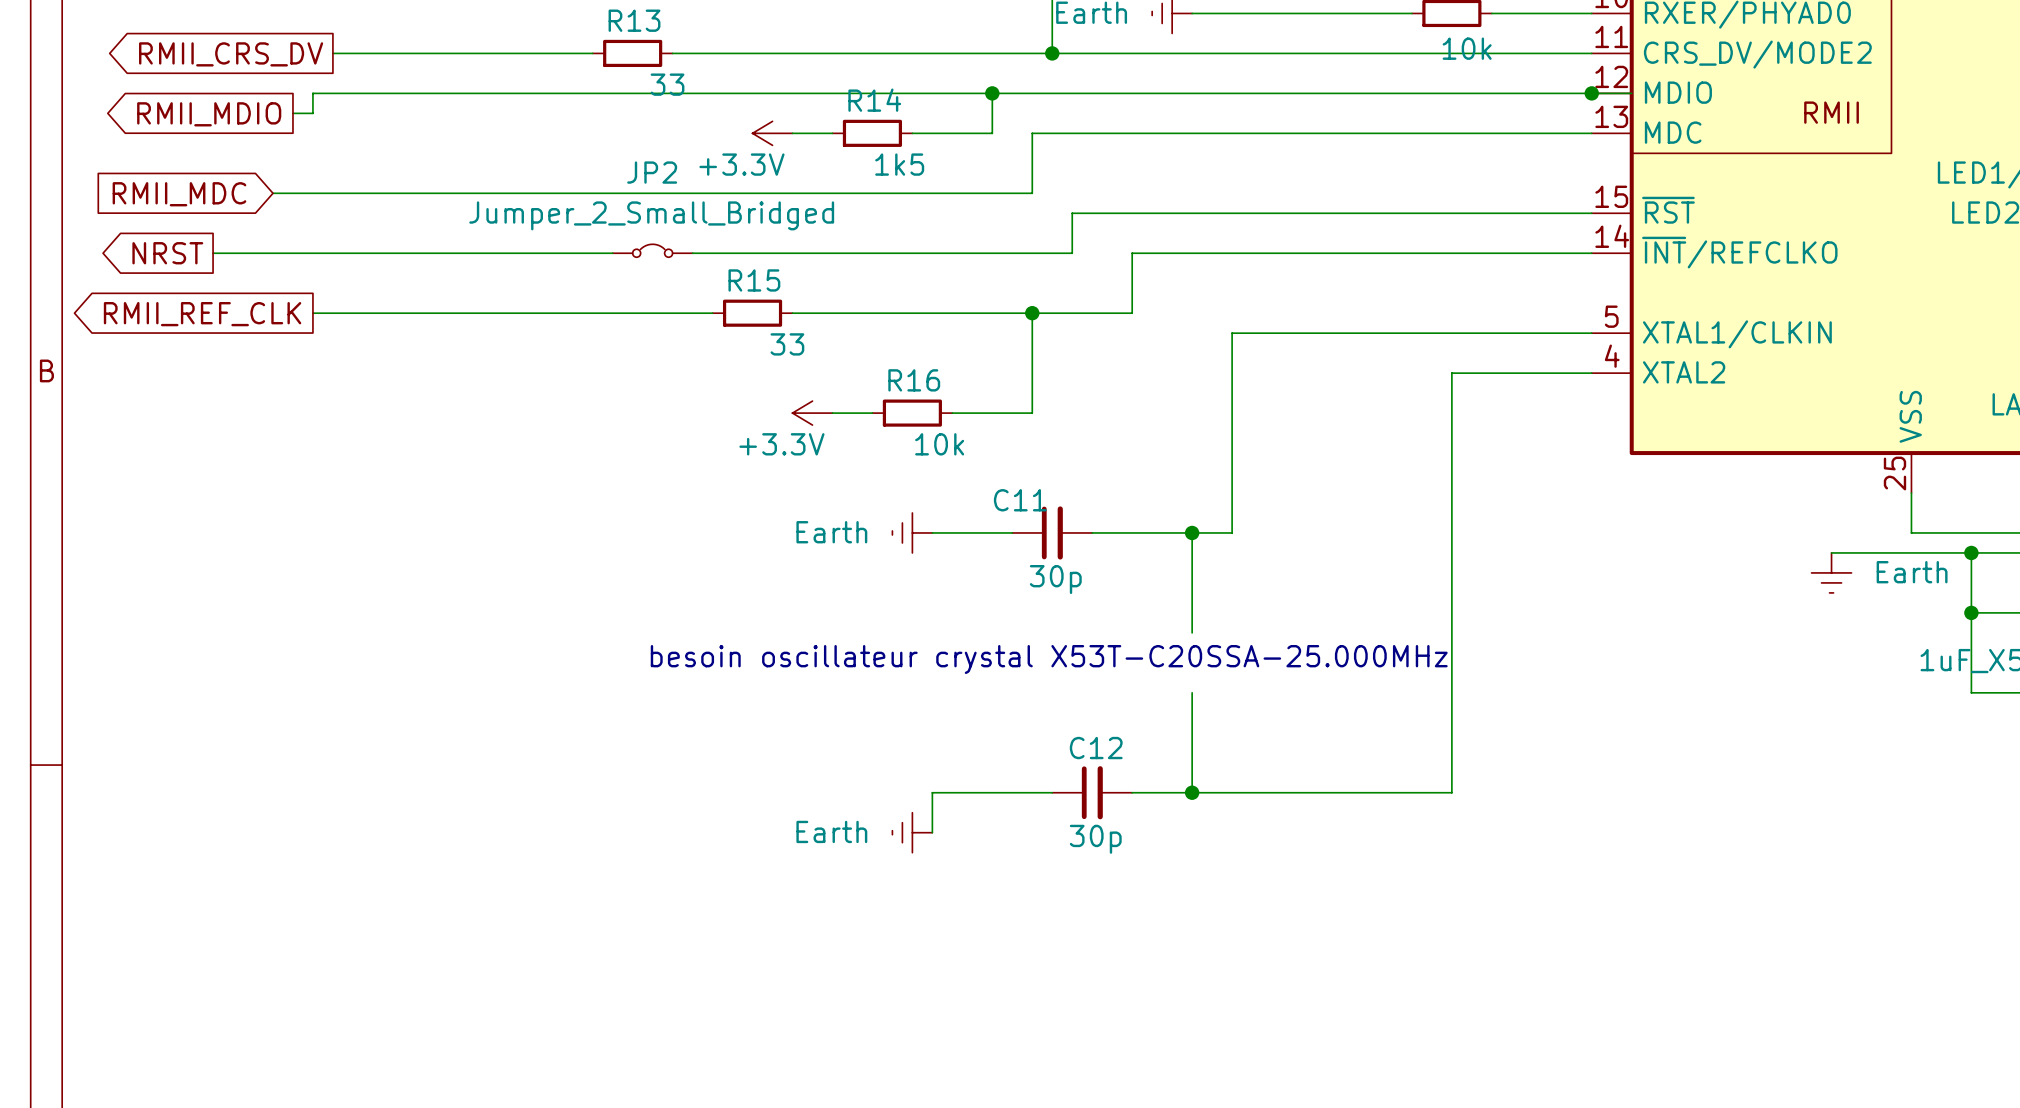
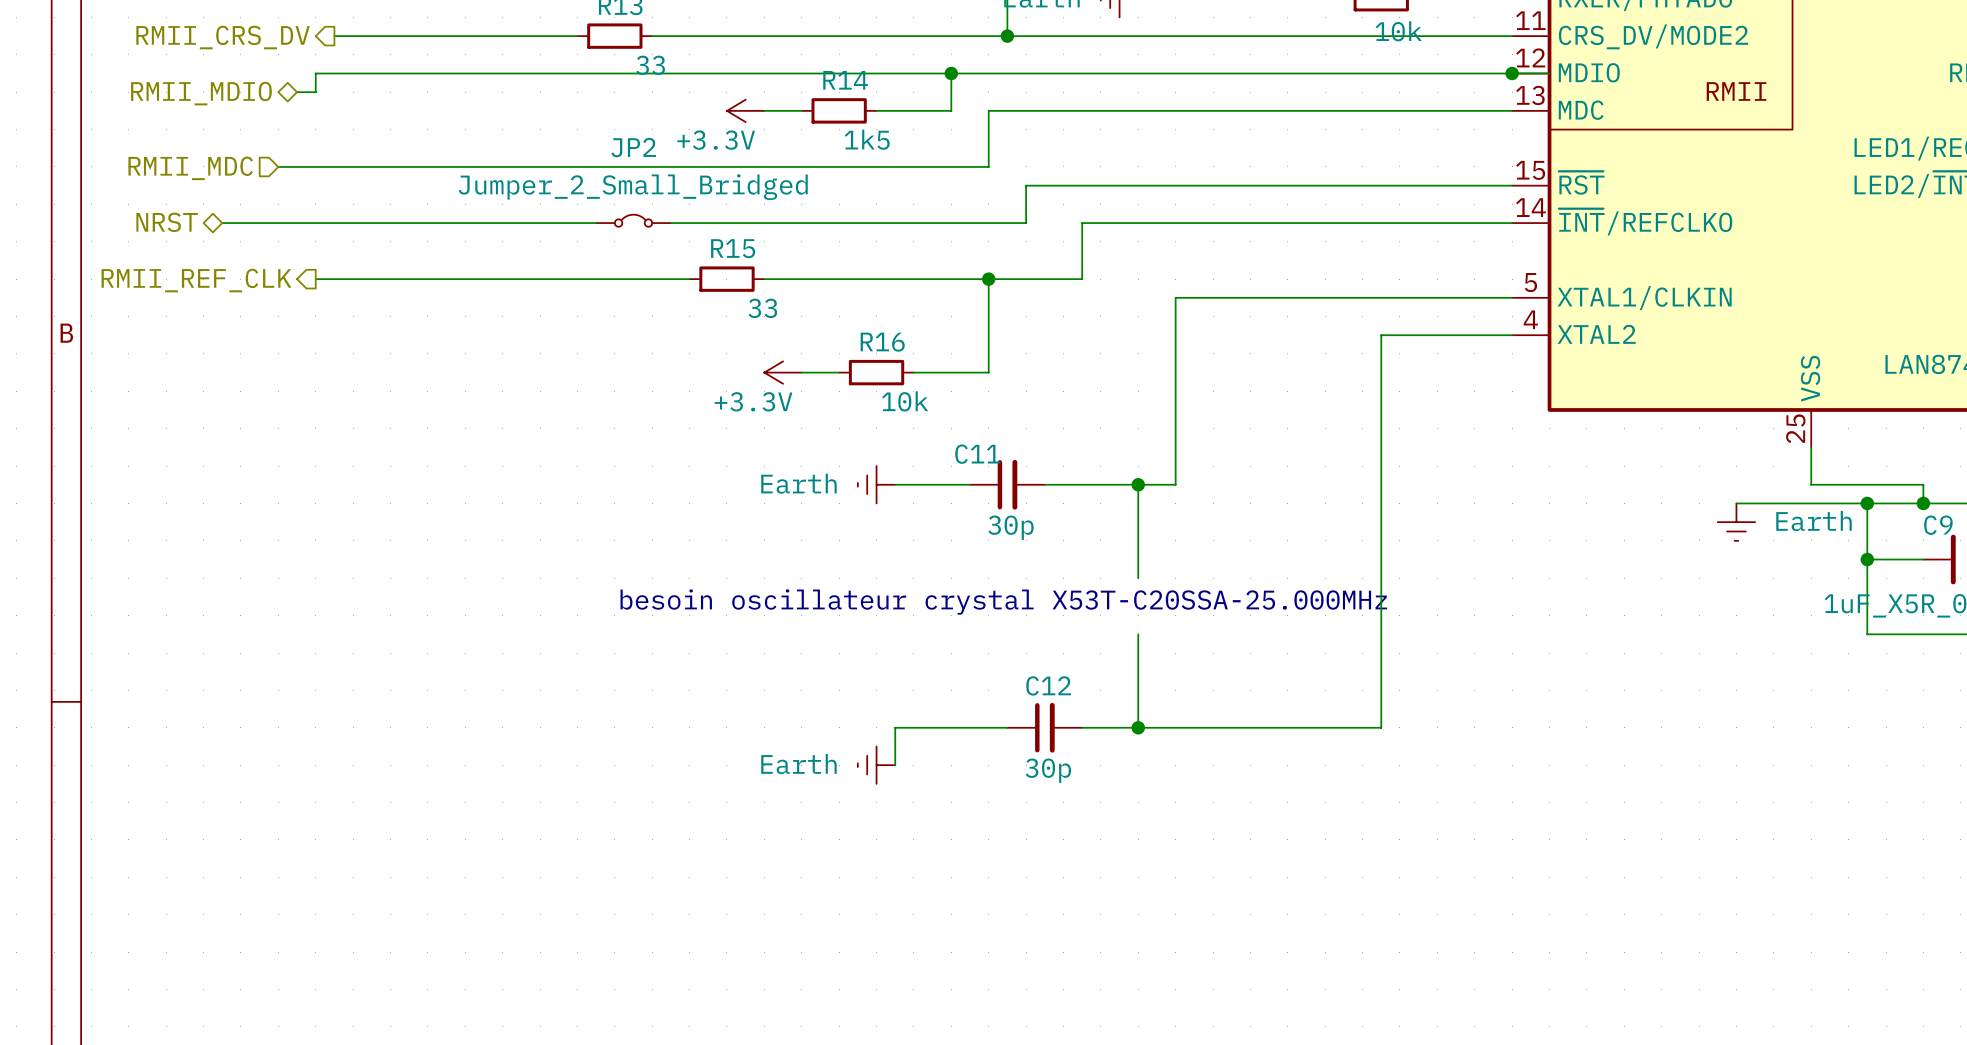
hierarchical label: none -> RMII_CRS_DV (223, 37)
global label: RMII_CRS_DV (231, 54) -> none
hierarchical label: none -> RMII_MDIO (201, 93)
global label: RMII_MDIO (209, 114) -> none
hierarchical label: none -> RMII_MDC (190, 168)
global label: RMII_MDC (179, 194) -> none
hierarchical label: none -> NRST (167, 222)
global label: NRST (167, 253) -> none
hierarchical label: none -> RMII_REF_CLK (196, 280)
global label: RMII_REF_CLK (202, 314) -> none

